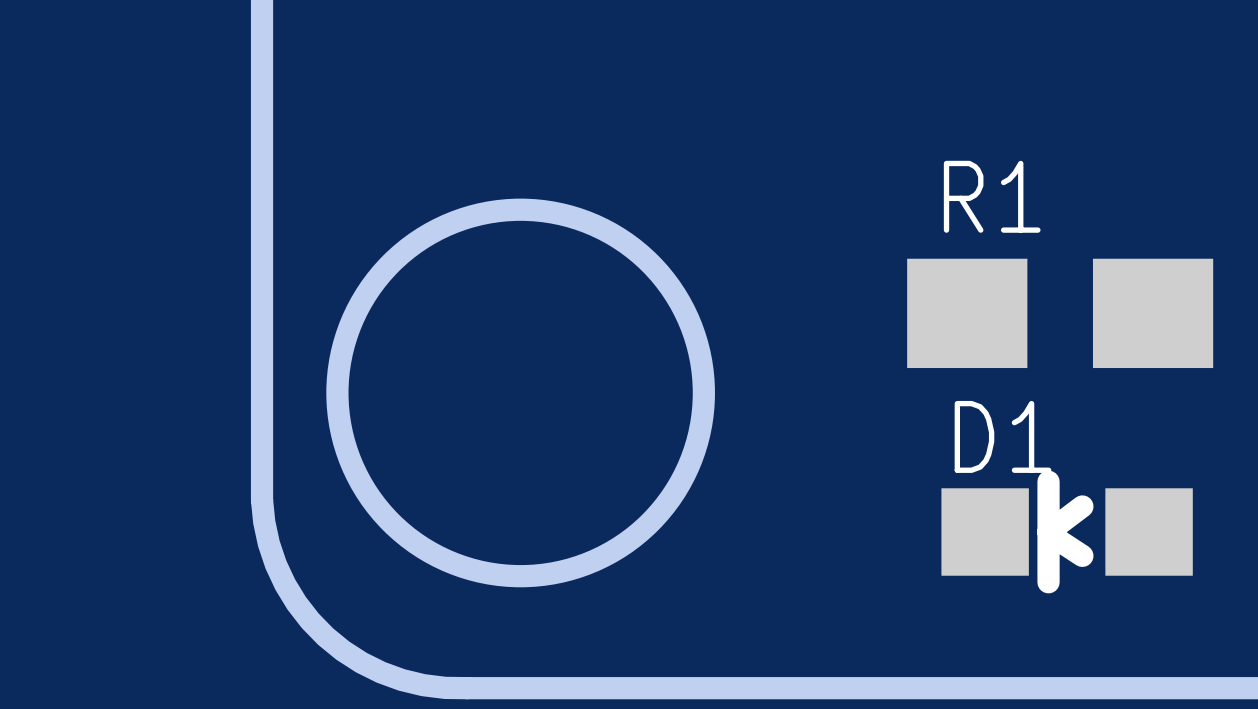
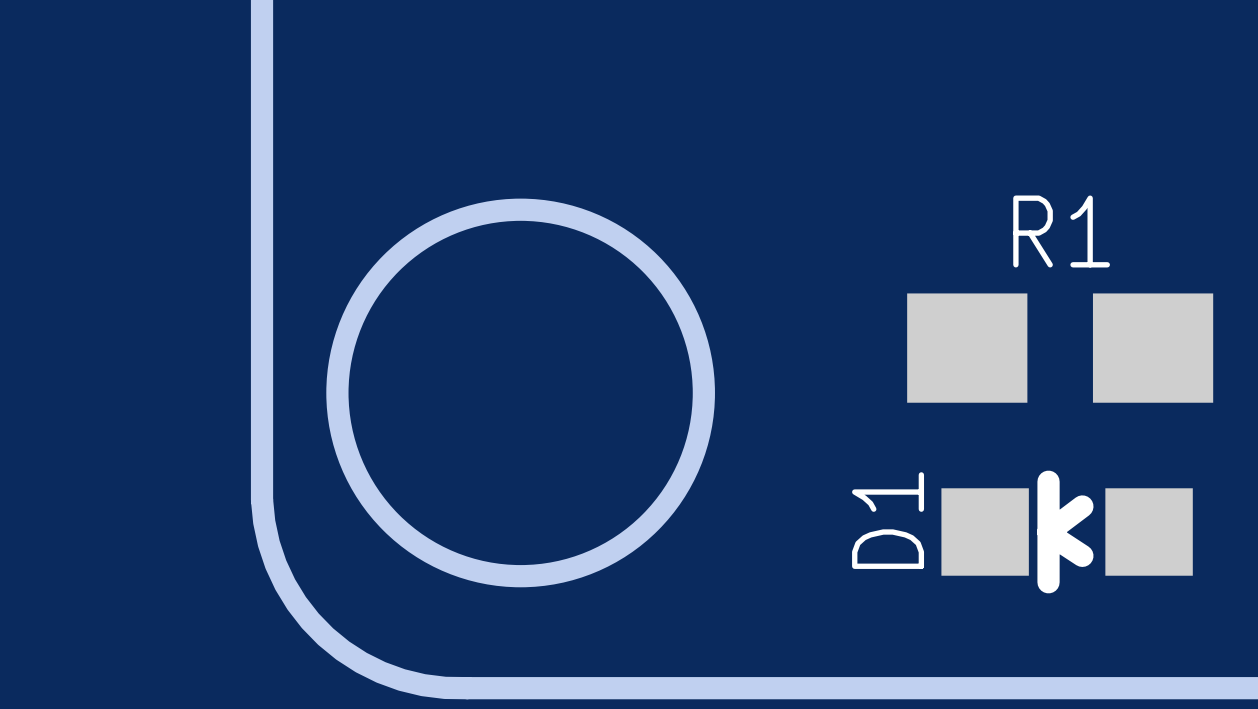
R1 name position: R1 (992, 196) -> R1 (1061, 231)
R1 position: (1060, 313) -> (1060, 348)
D1 name rotation: 0° (1003, 436) -> 90° counterclockwise (888, 520)

